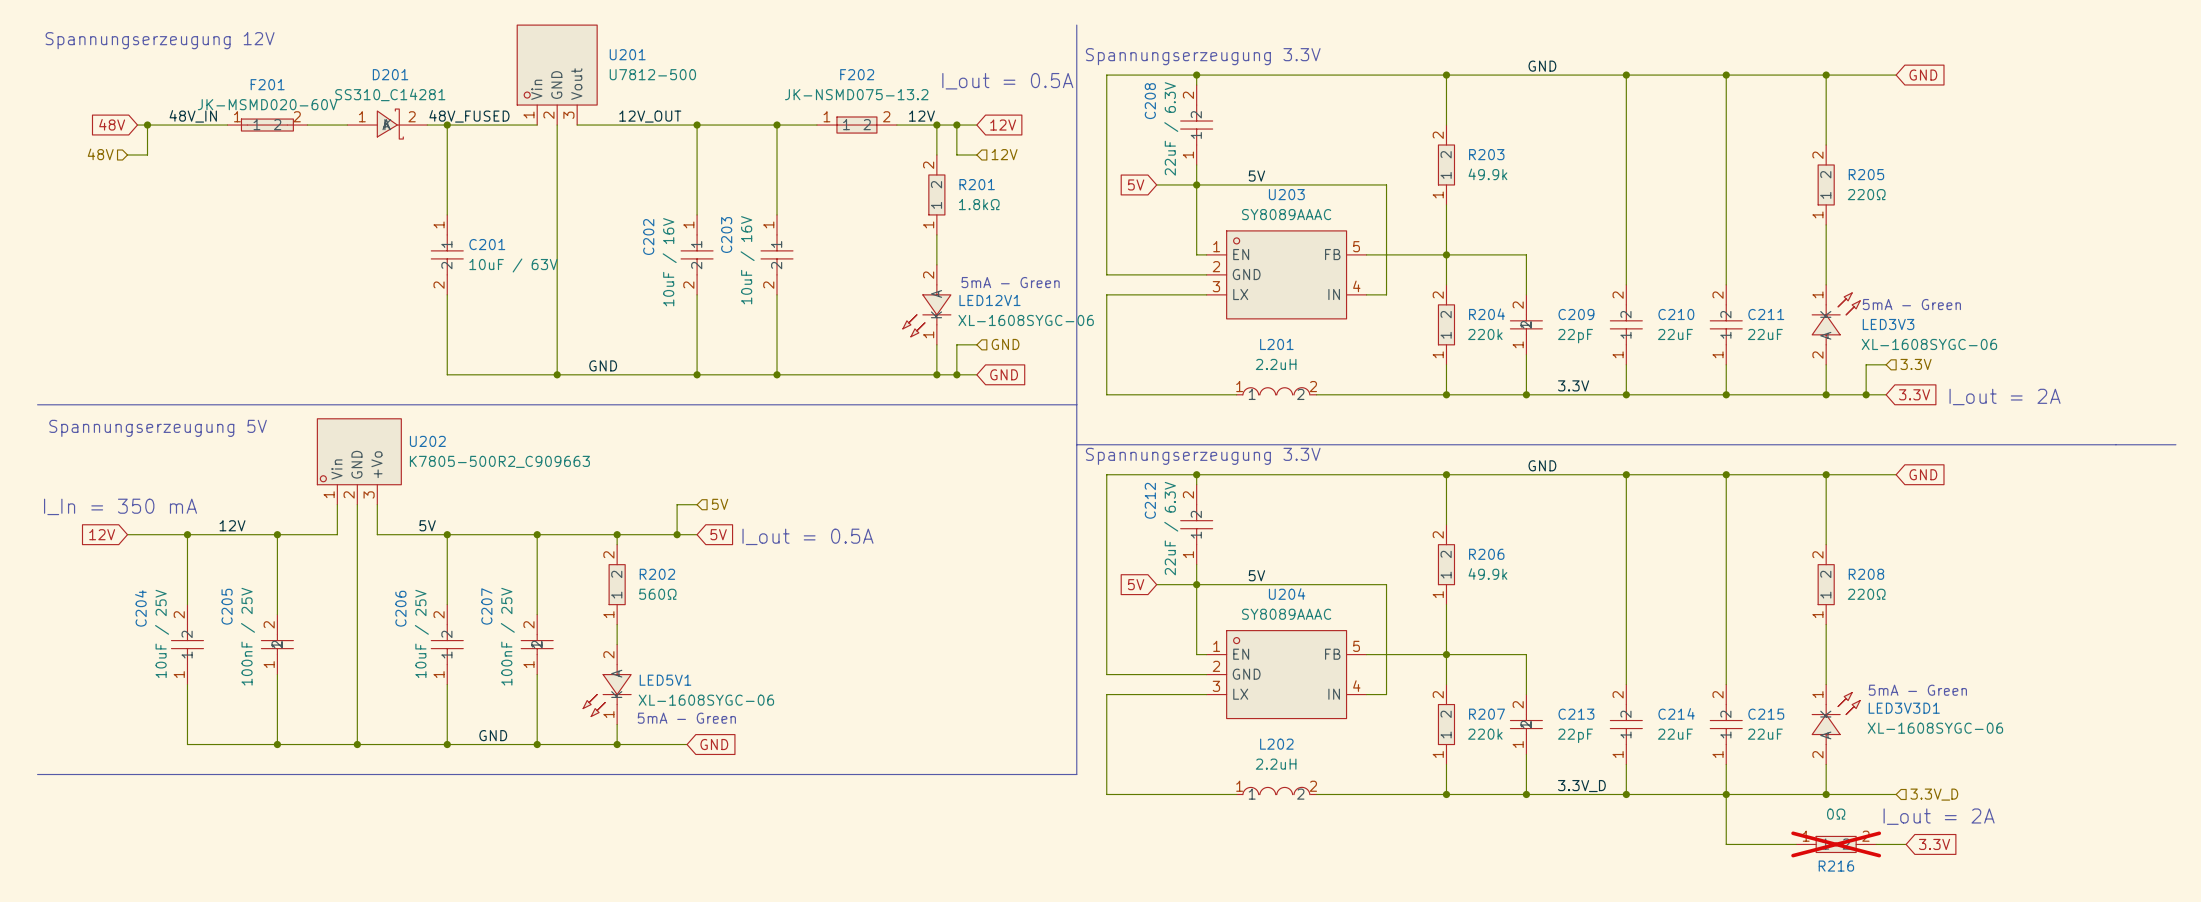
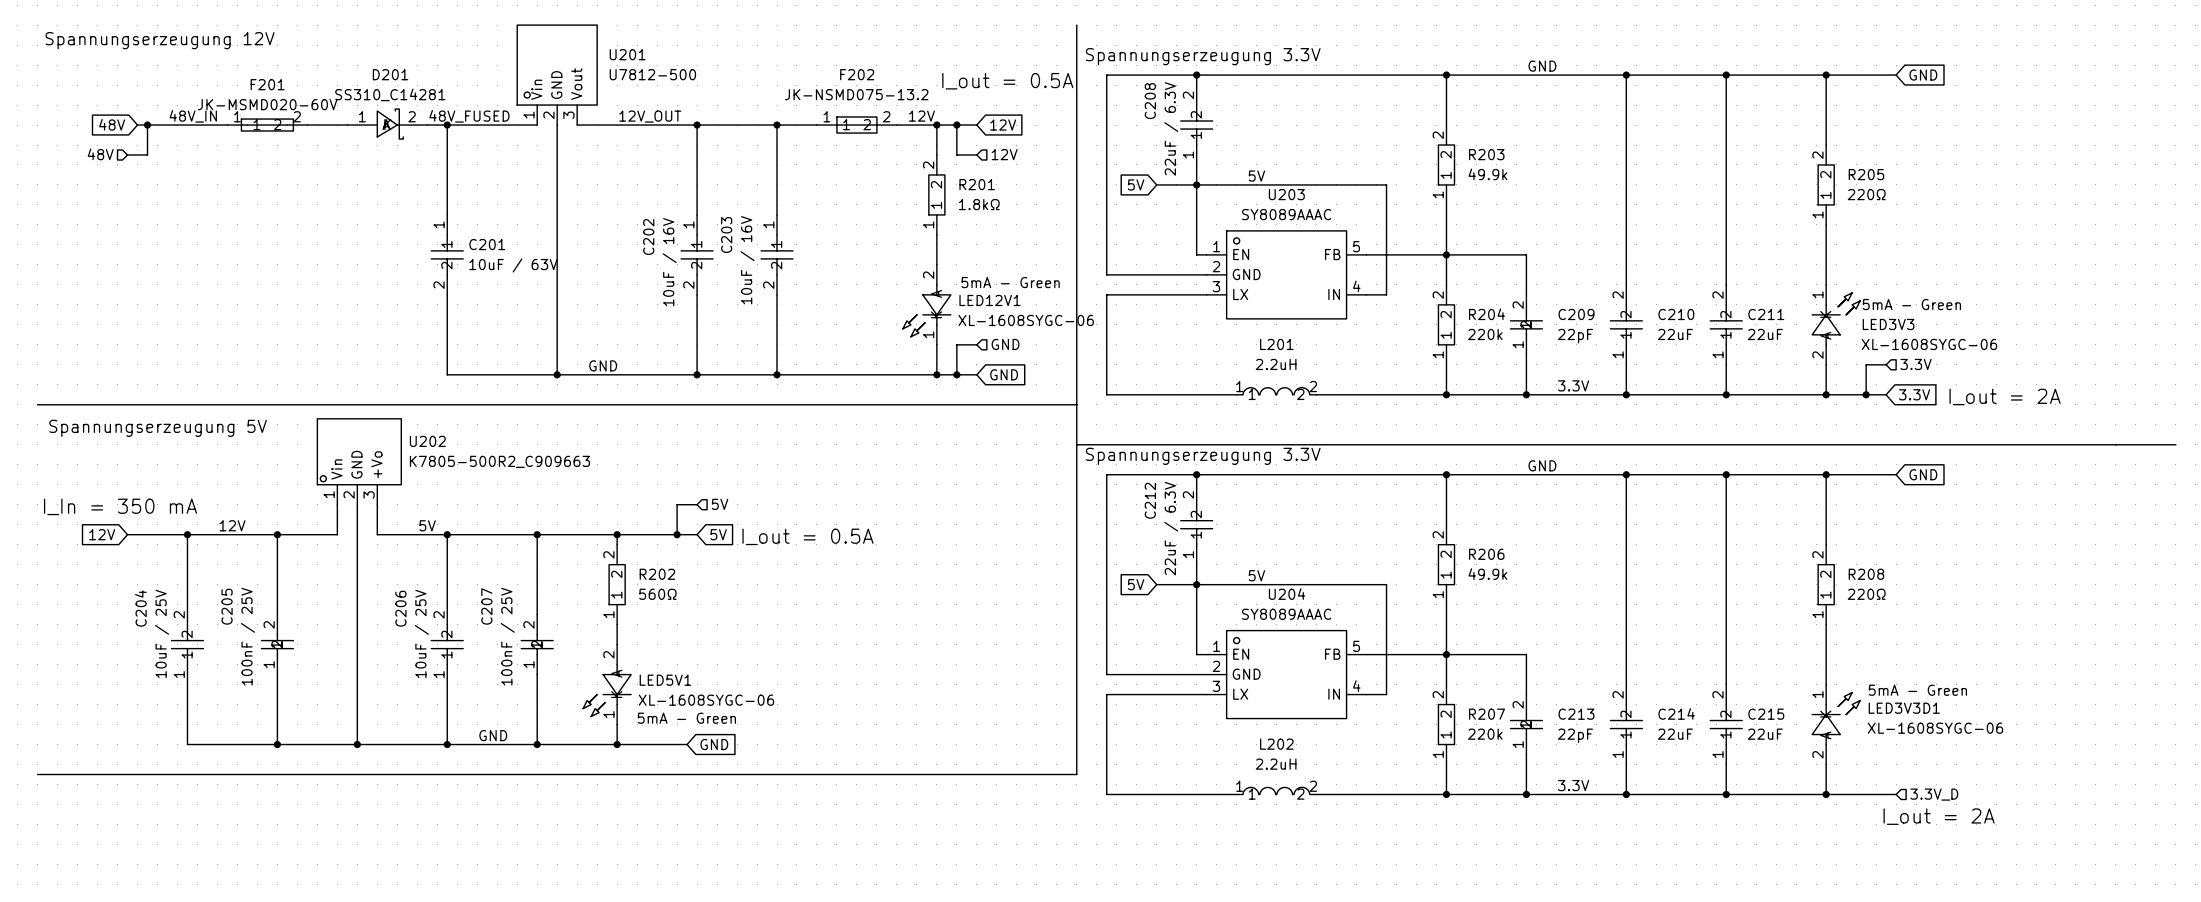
label: 3.3V_D (1581, 786) -> 3.3V (1573, 785)
wire: (1726, 794) (1726, 844) (1796, 844) -> none
R216: 0Ω (1836, 844) -> none
wire: (1876, 844) (1906, 844) -> none
global label: 3.3V (1934, 844) -> none

